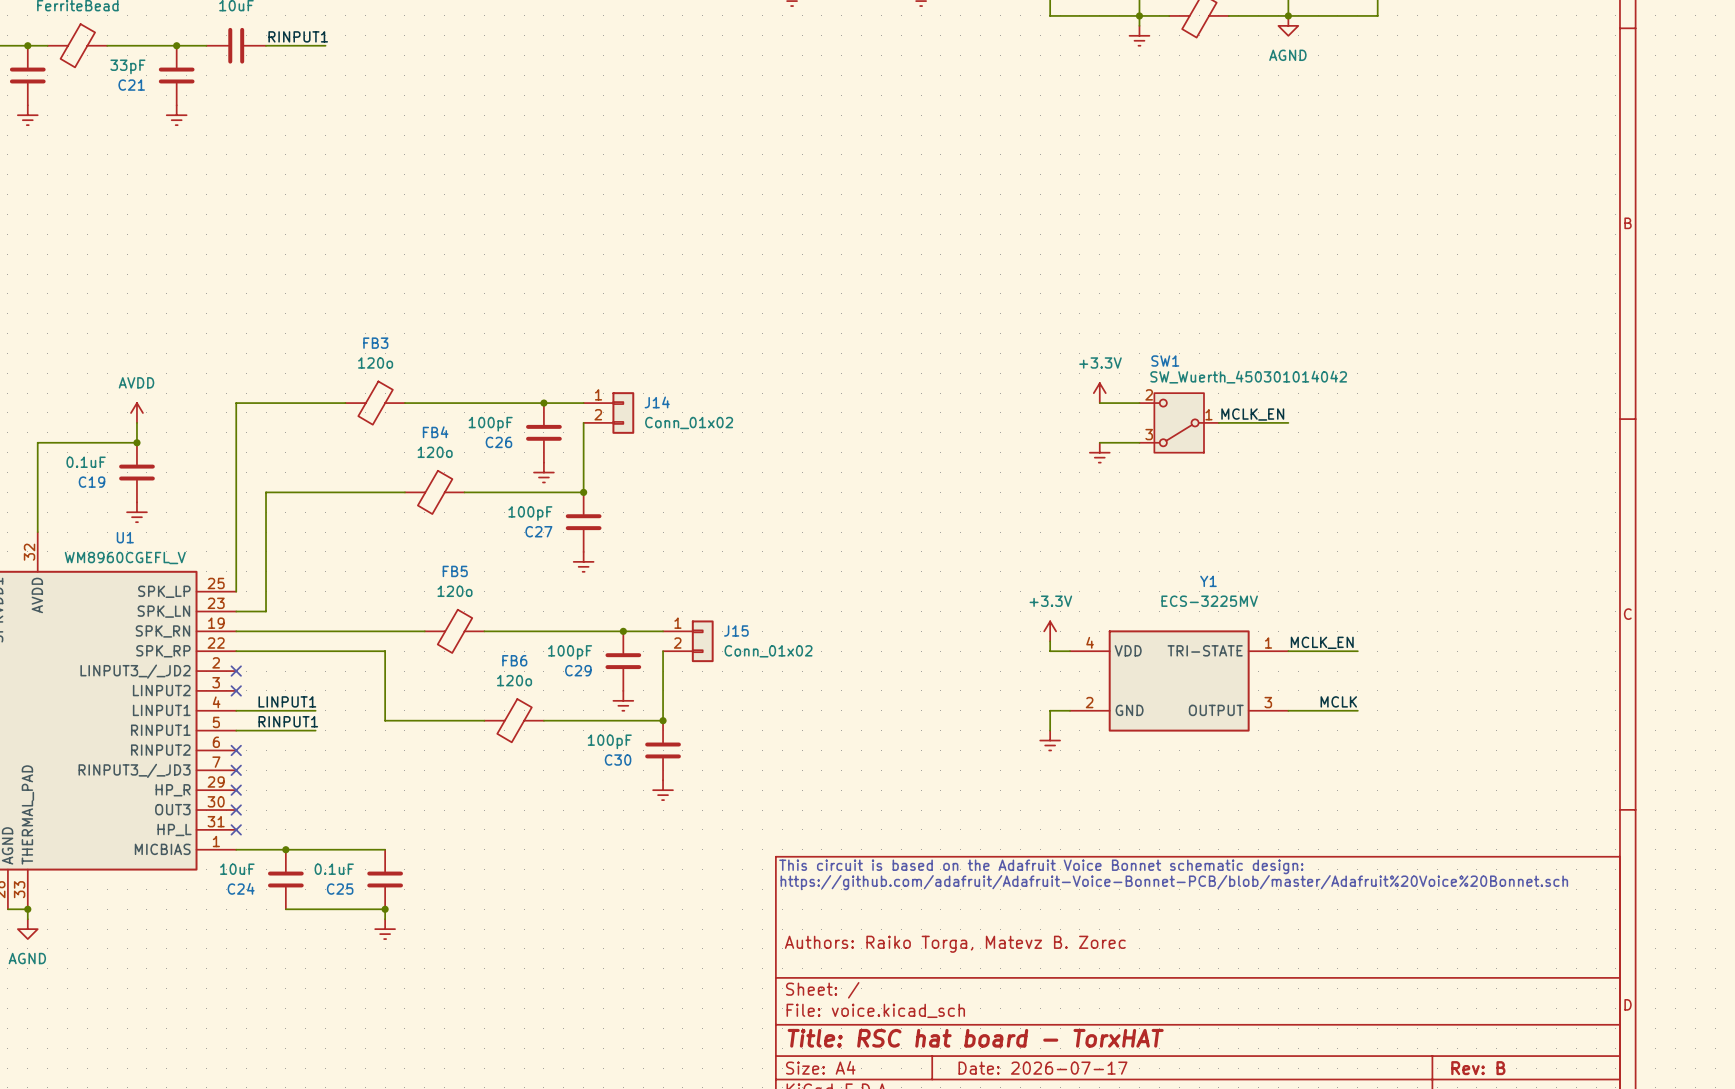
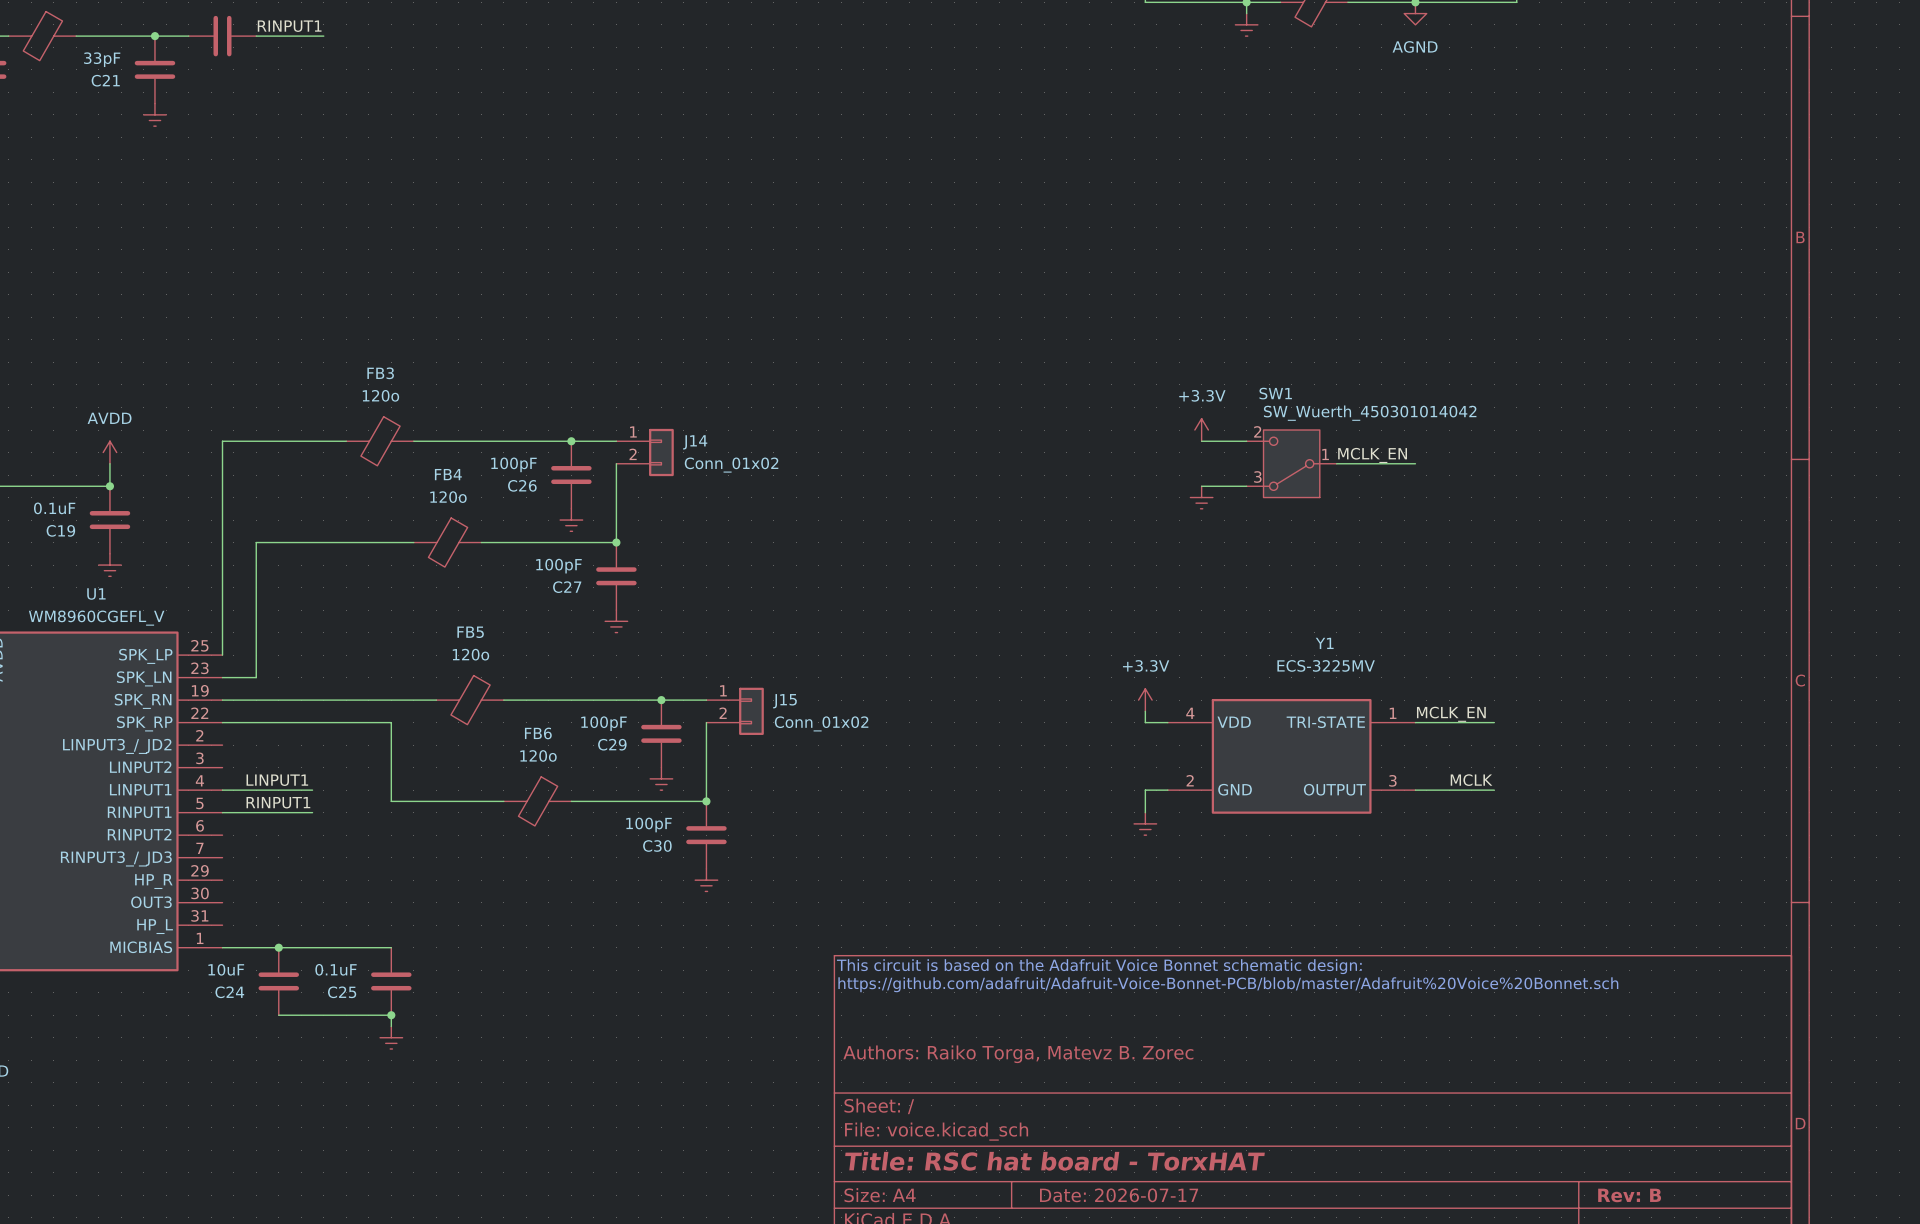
no-connect mark: (236, 671) -> none
no-connect mark: (236, 690) -> none
no-connect mark: (236, 750) -> none
no-connect mark: (236, 770) -> none
no-connect mark: (236, 790) -> none
no-connect mark: (236, 810) -> none
no-connect mark: (236, 829) -> none

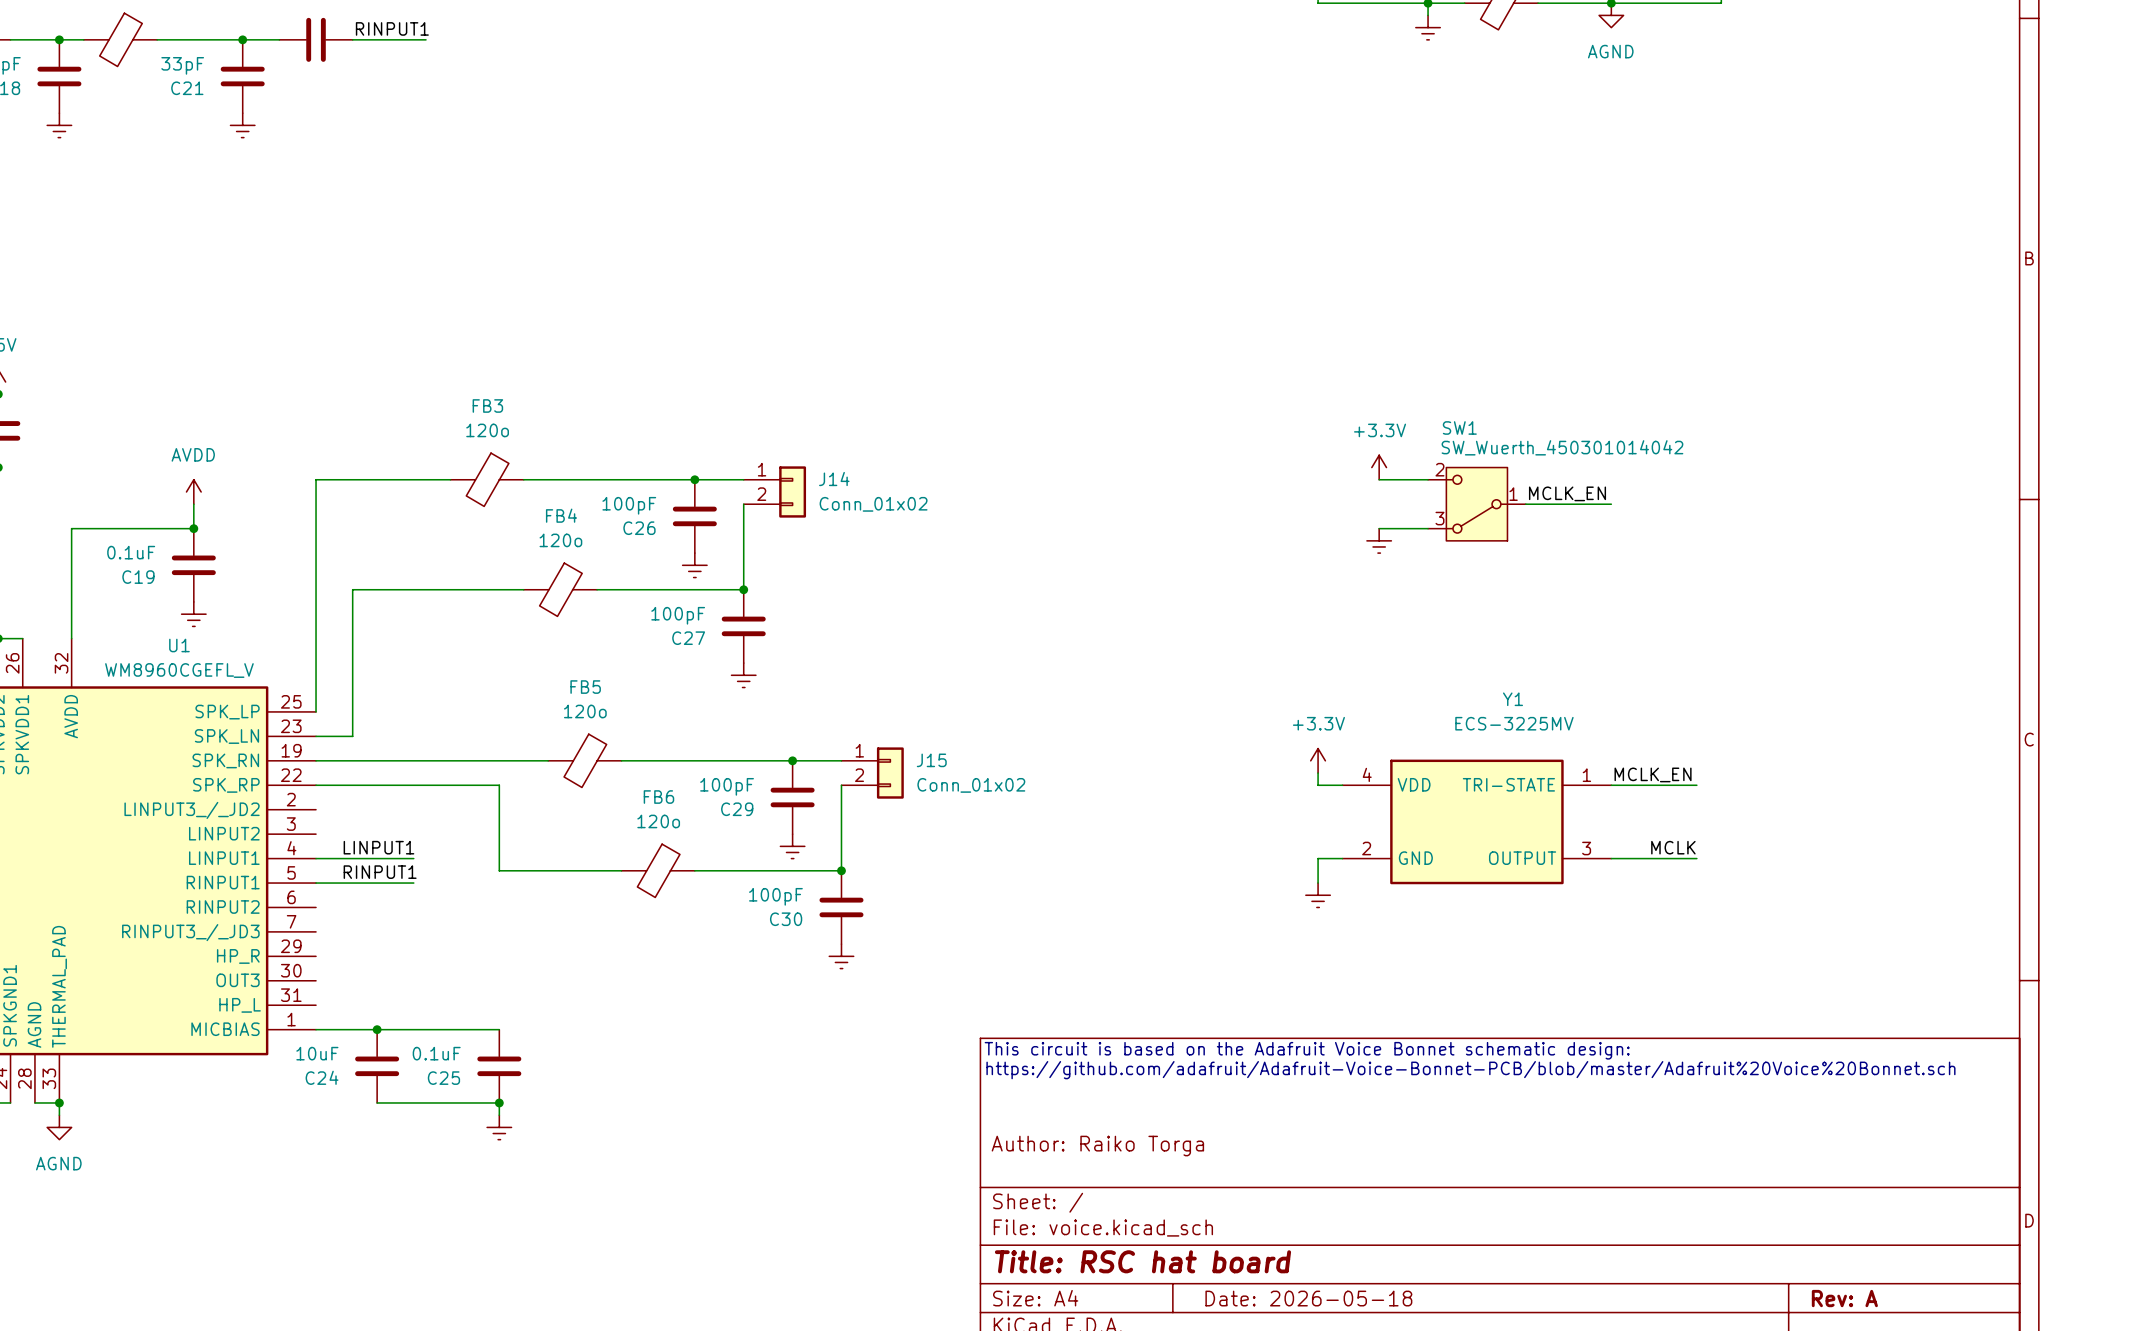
title block: Authors: Raiko Torga, Matevz B. Zorec (1018, 1054) -> Author: Raiko Torga (1097, 1146)
title block: Title: RSC hat board - TorxHAT (1054, 1161) -> Title: RSC hat board (1142, 1261)
title block: Date: 2026-07-17 (1119, 1195) -> Date: 2026-05-18 (1308, 1298)
title block: Rev: B (1629, 1195) -> Rev: A (1844, 1298)

